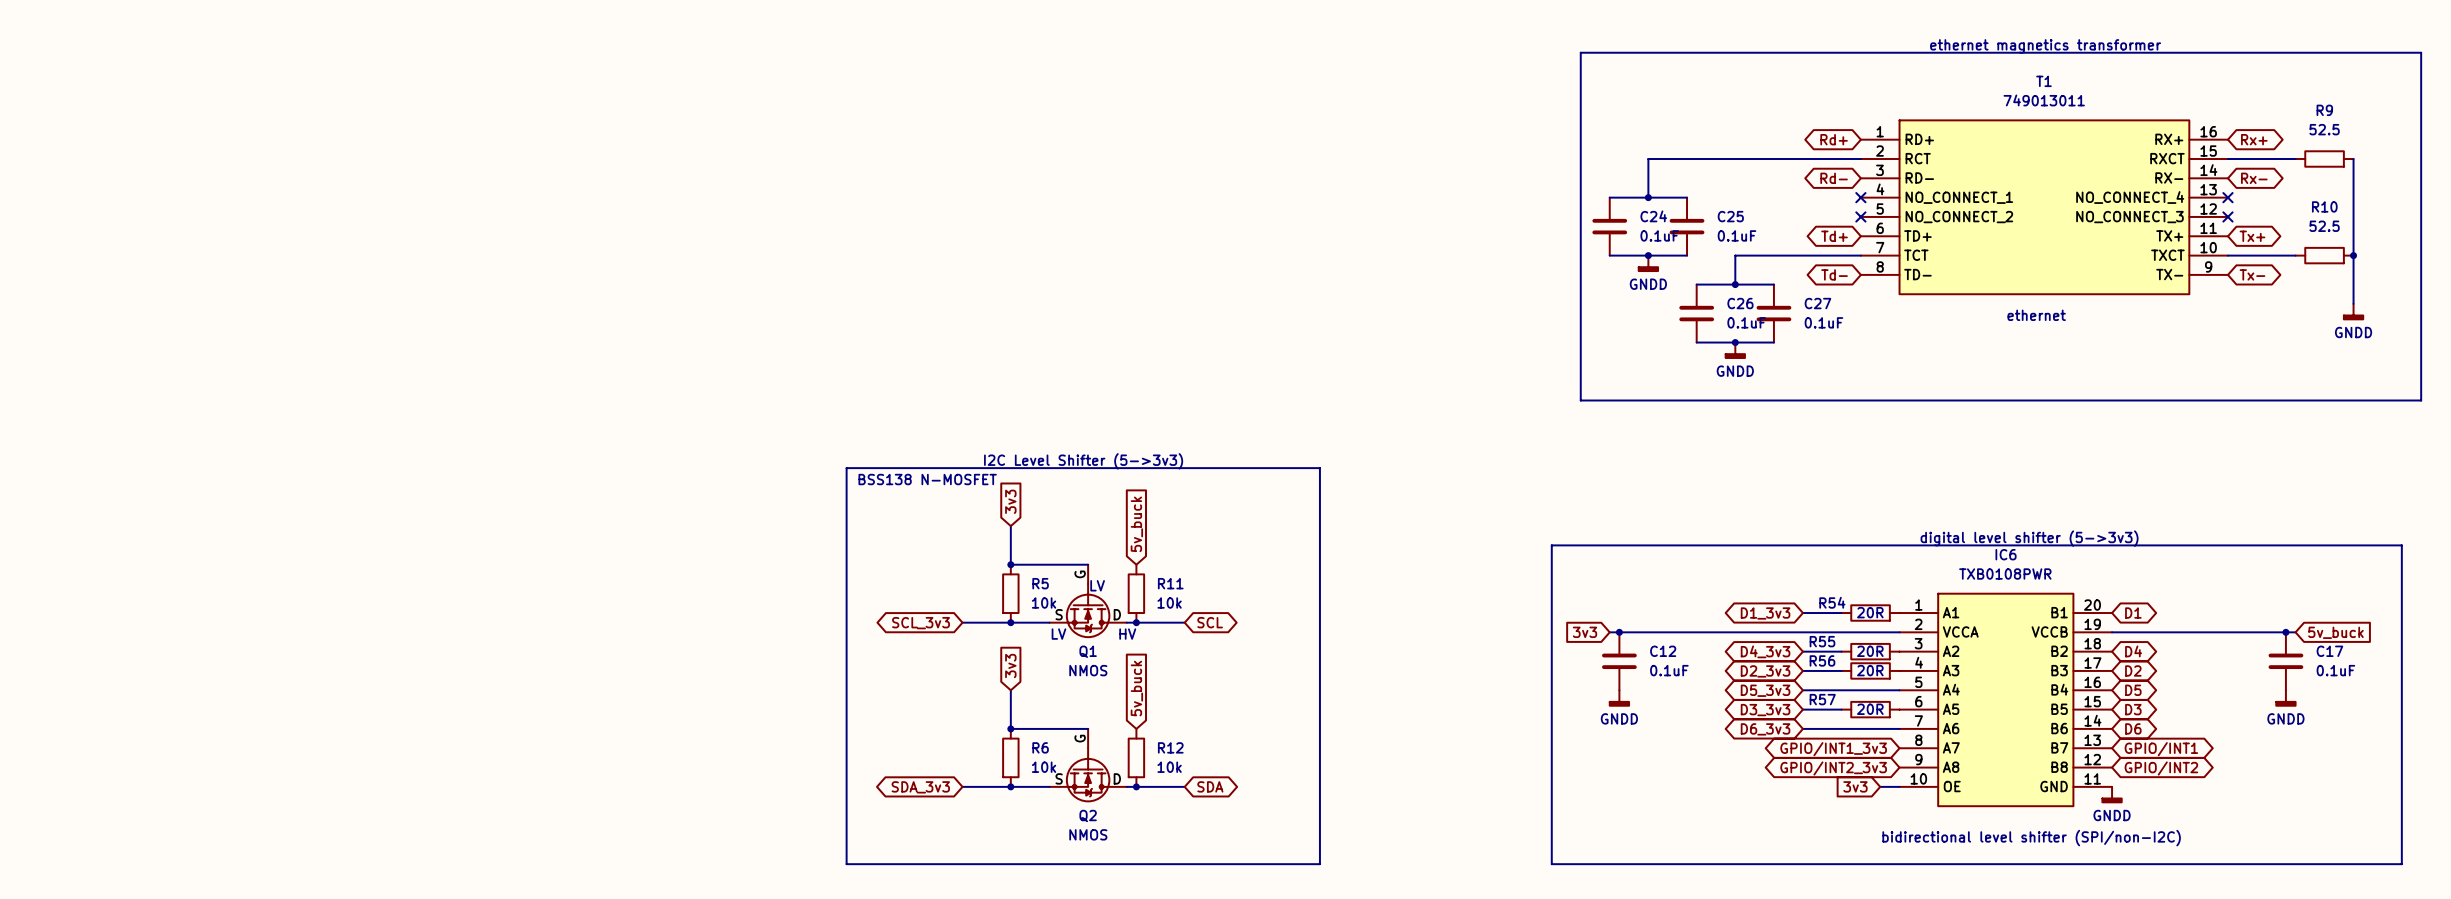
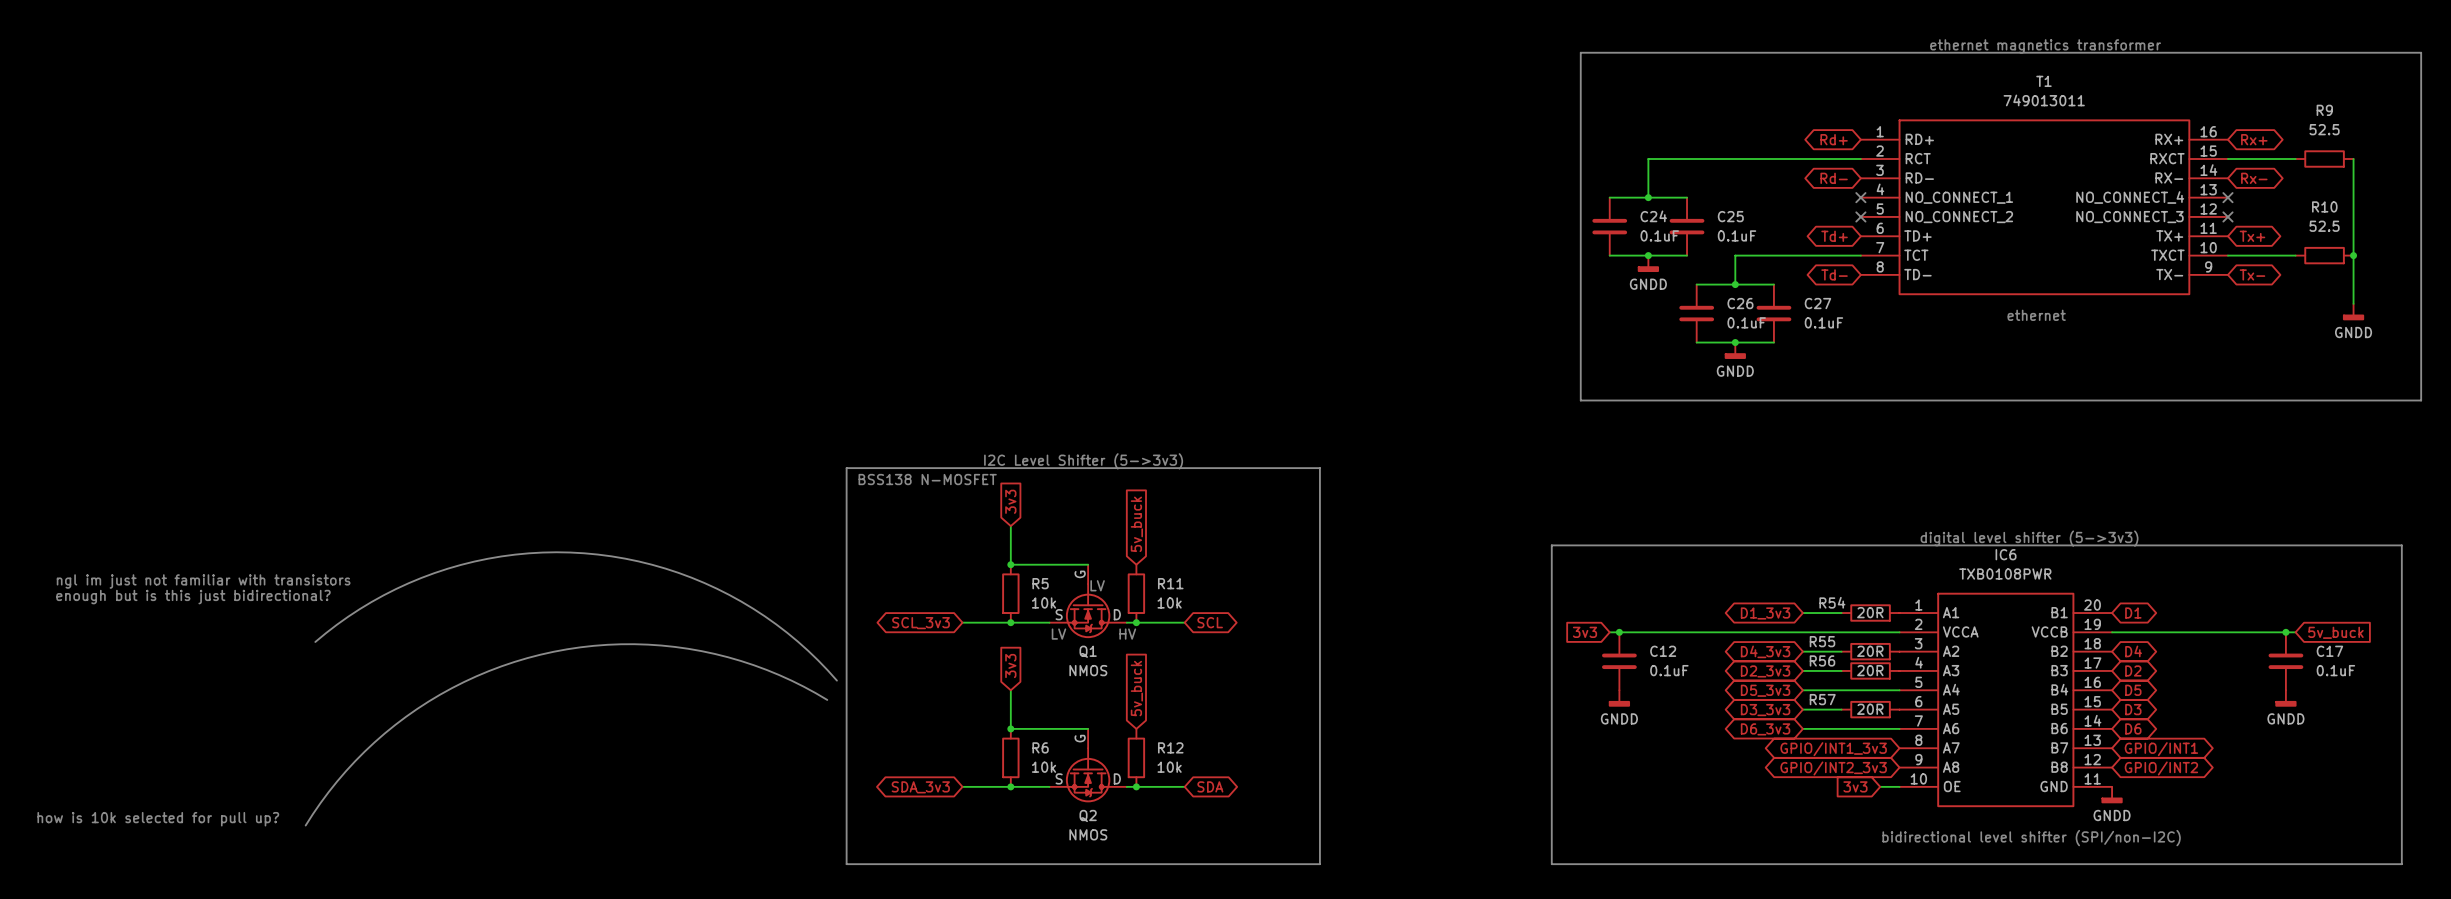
text: none -> ngl im just not familiar with transistors (203, 581)
text: none -> enough but is this just bidirectional? (193, 597)
line: none -> (315, 641) (348, 616) (383, 595) (421, 577) (447, 568) (487, 558) (515, 554) (542, 552) (584, 553) (611, 556) (652, 564) (691, 577) (717, 588) (753, 608) (787, 632) (808, 650) (836, 680)
line: none -> (827, 699) (766, 669) (728, 657) (688, 648) (647, 644) (607, 644) (540, 654) (501, 666) (464, 682) (406, 716) (355, 761) (328, 792) (305, 825)
text: none -> how is 10k selected for pull up? (158, 819)

